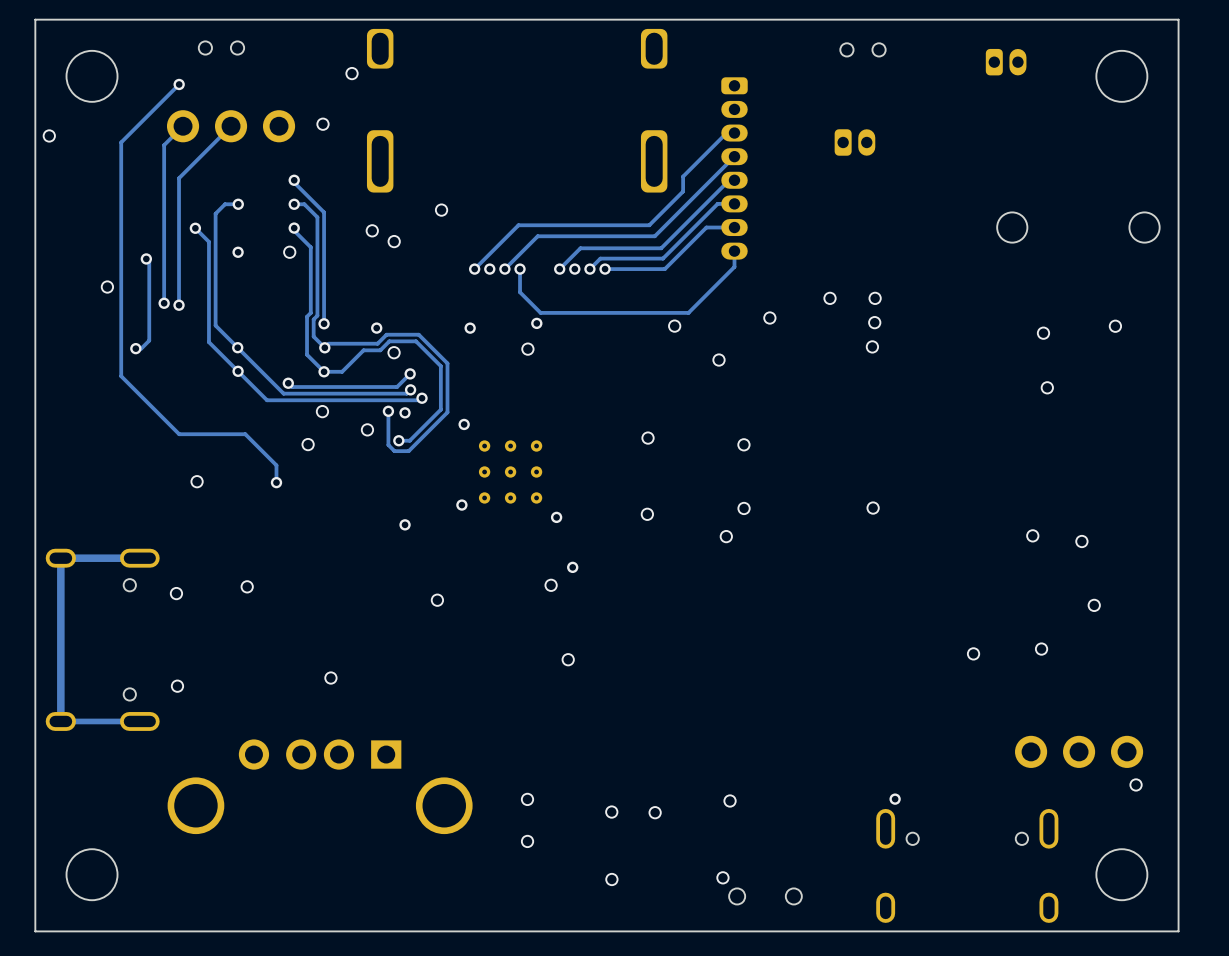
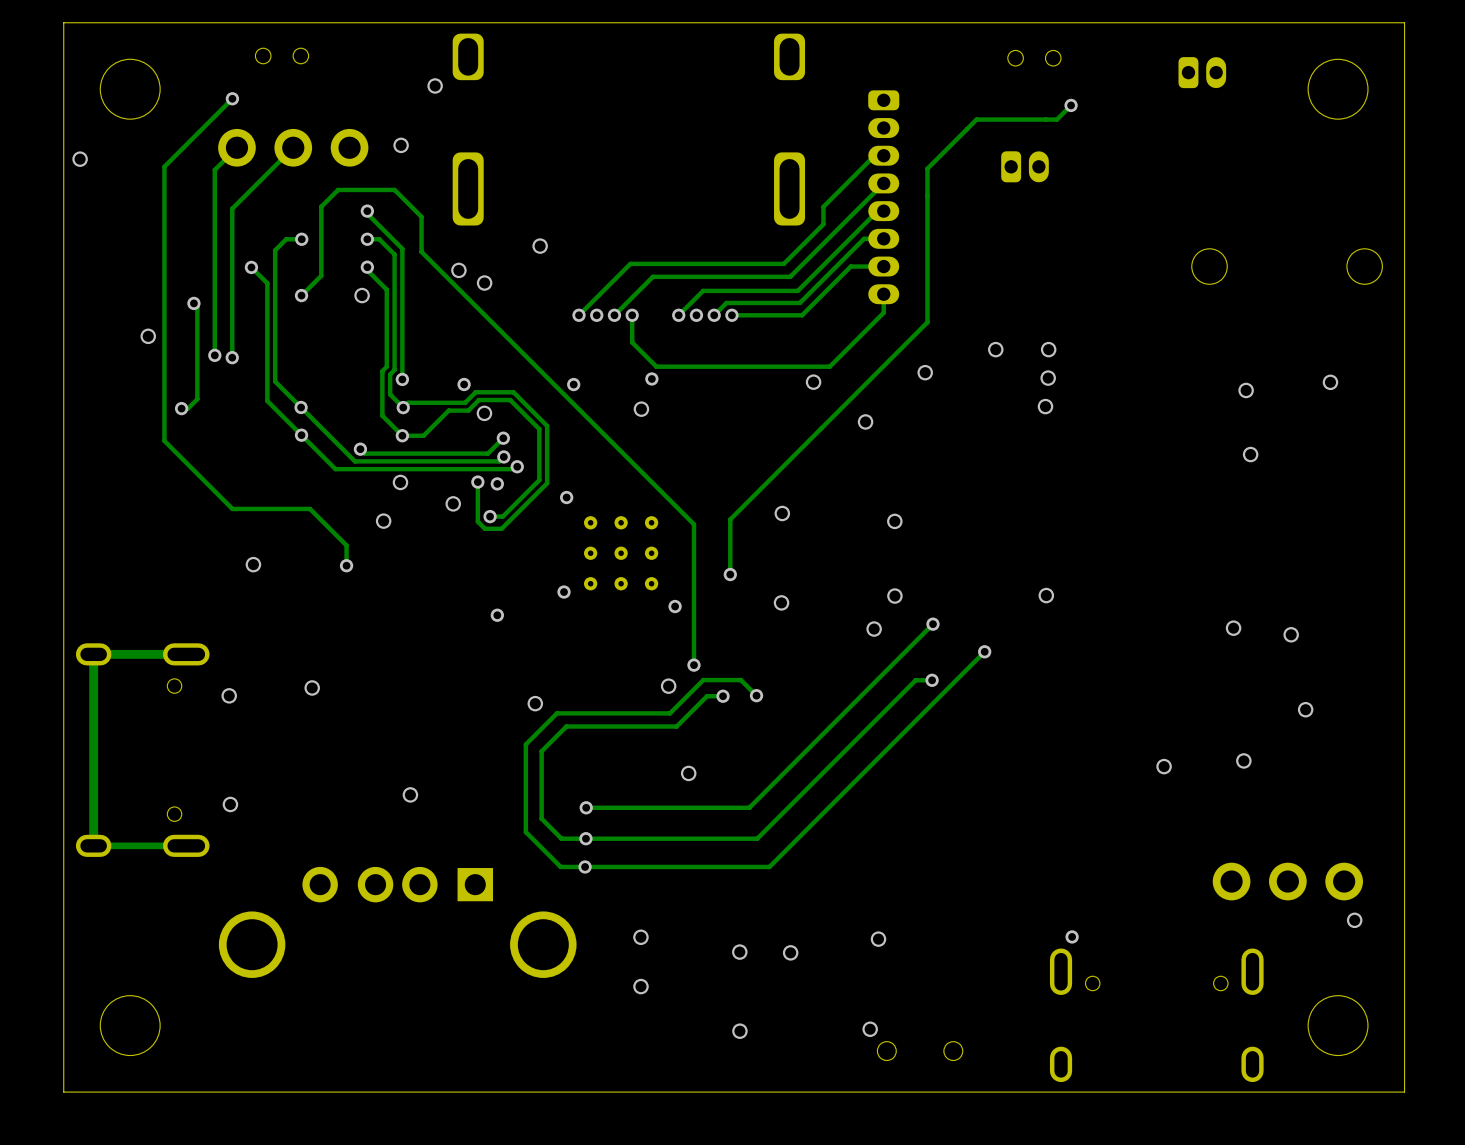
track: none -> (1071, 105) (1056, 119) (976, 119) (927, 168) (927, 322) (730, 519) (730, 574)
via: none -> (1071, 105)
track: none -> (301, 295) (321, 275) (321, 206) (338, 189) (394, 189) (421, 216) (421, 251) (693, 524) (693, 665)
via: none -> (730, 574)
track: none -> (933, 623) (749, 807) (586, 807)
via: none -> (932, 624)
track: none -> (984, 651) (769, 866) (560, 866) (525, 832) (525, 744) (556, 713) (670, 713) (703, 680) (740, 680) (756, 695)
via: none -> (984, 651)
track: none -> (932, 680) (915, 680) (757, 838) (561, 838) (541, 818) (541, 751) (566, 726) (676, 726) (706, 696) (723, 696)
via: none -> (932, 680)
via: none -> (723, 696)
via: none -> (756, 695)
via: none -> (586, 807)
via: none -> (585, 838)
via: none -> (585, 866)

